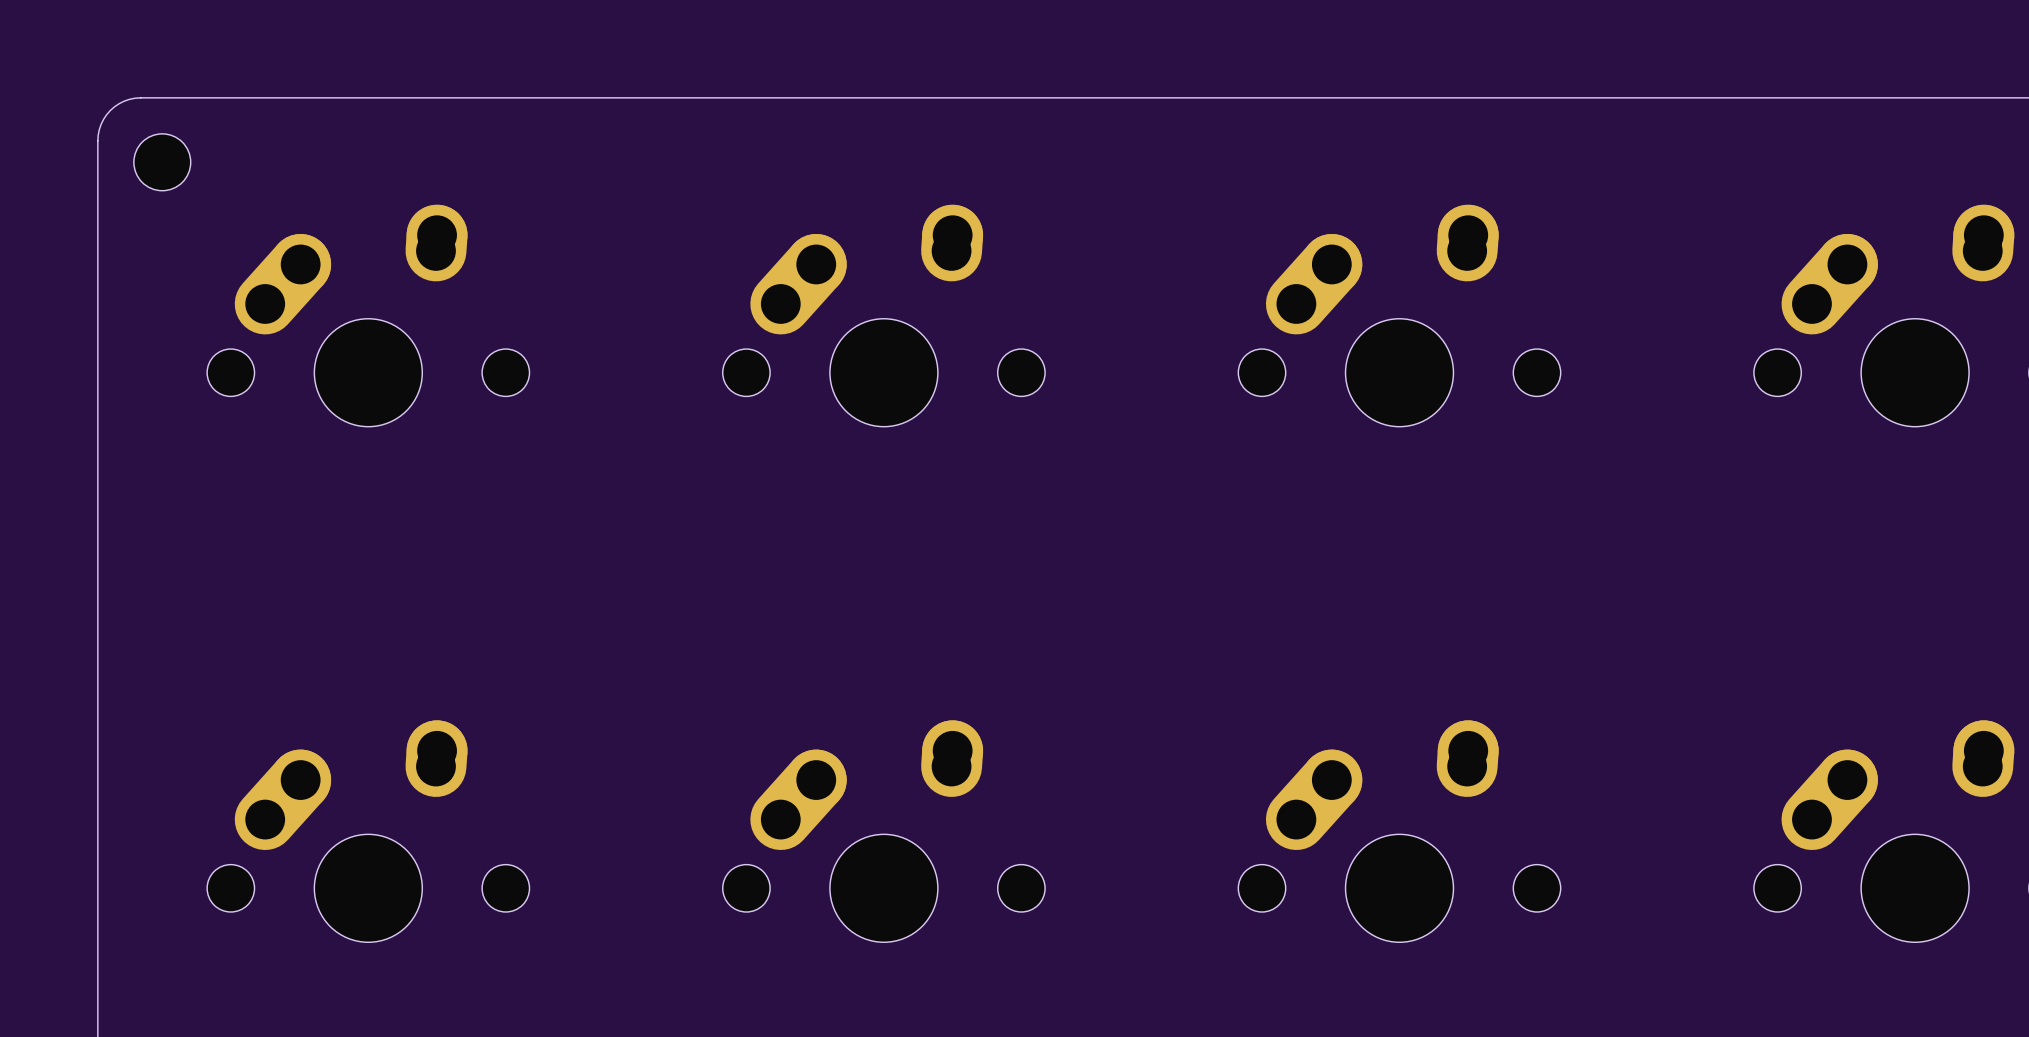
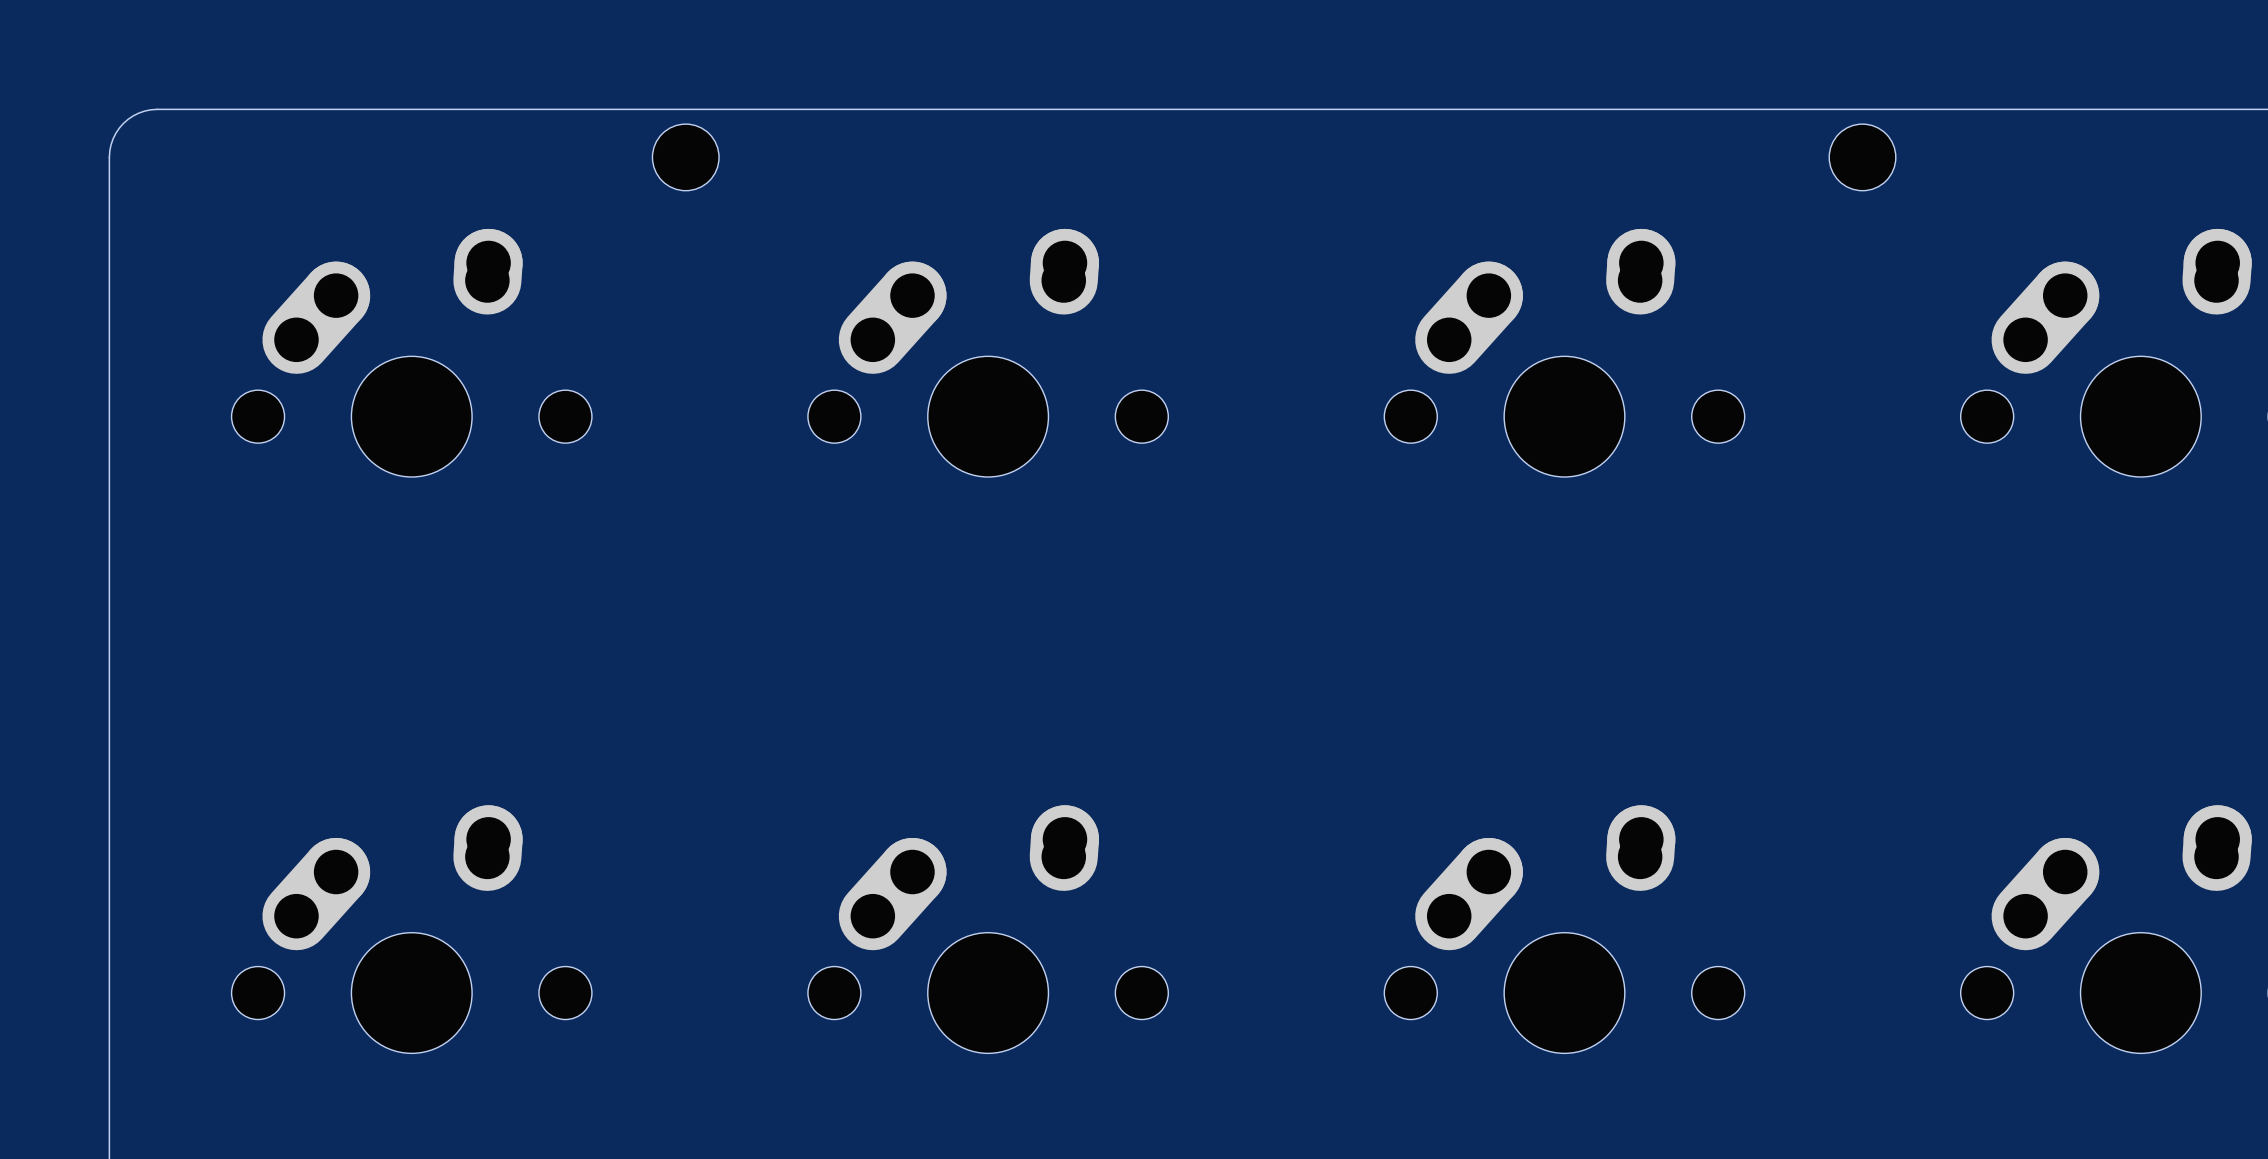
part: none -> (685, 157)
part: none -> (1862, 157)
part: (162, 162) -> none

